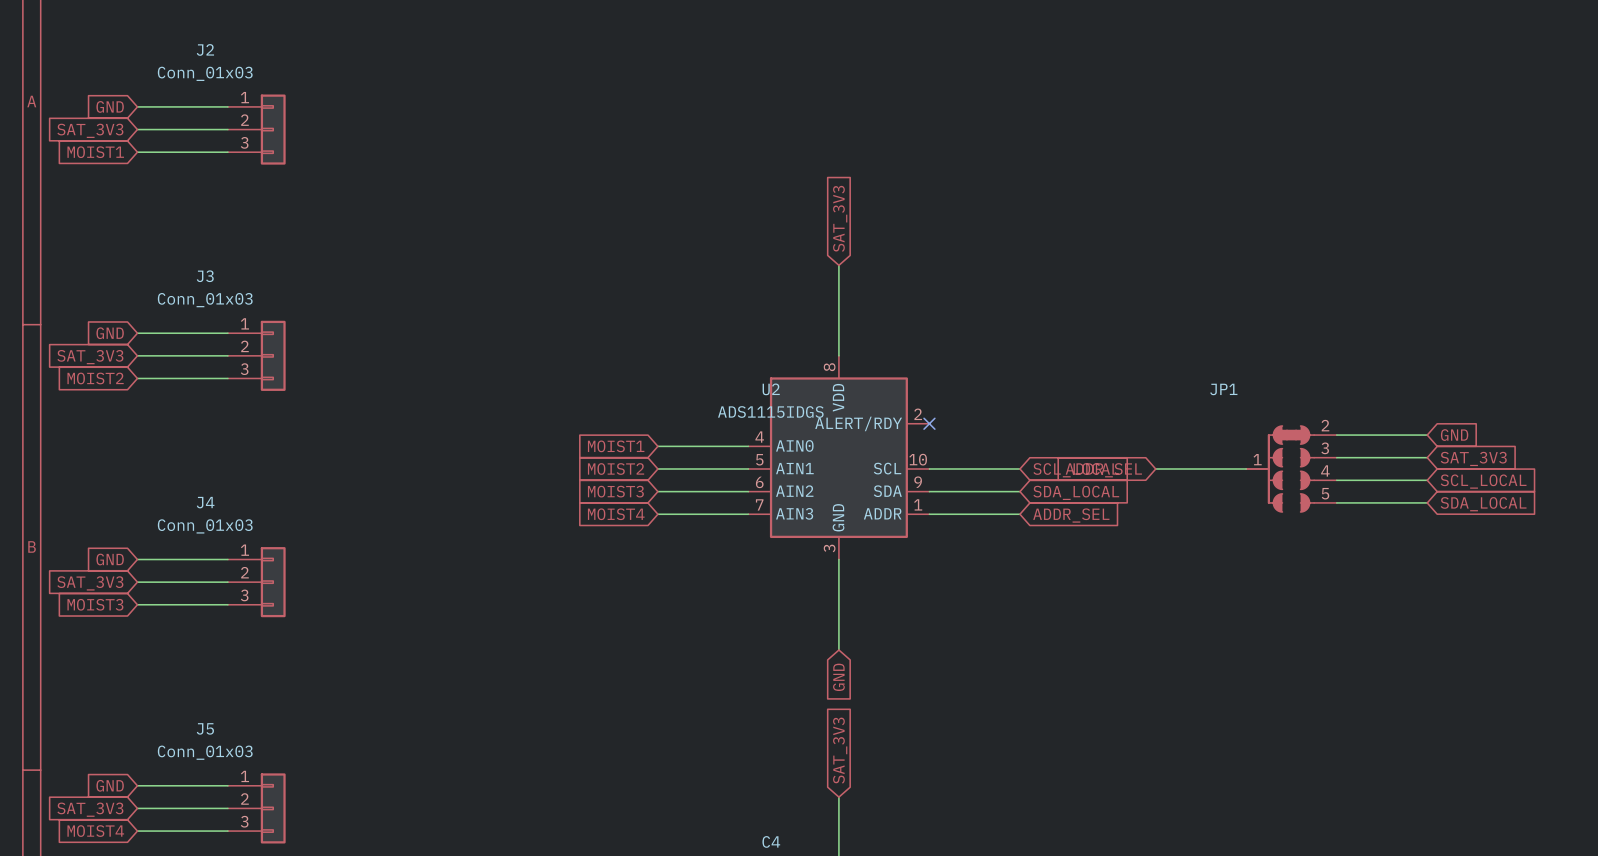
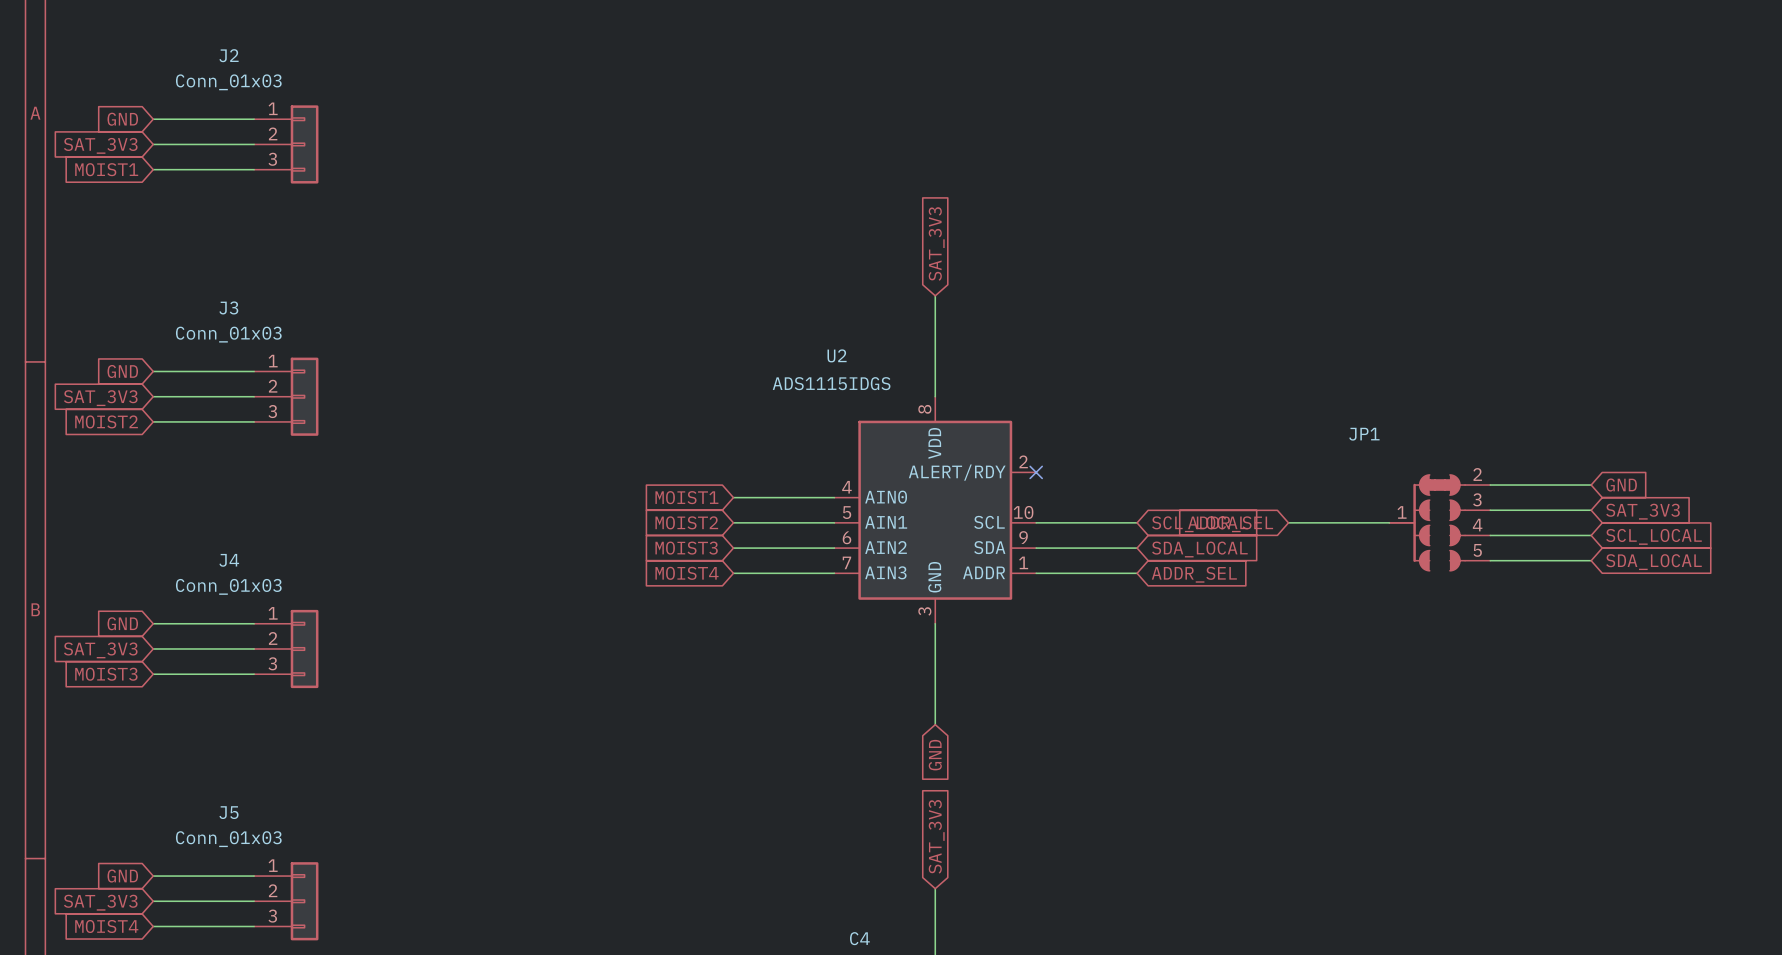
U2 name position: U2 (771, 389) -> U2 (837, 355)
U2 value position: ADS1115IDGS (770, 412) -> ADS1115IDGS (831, 383)

